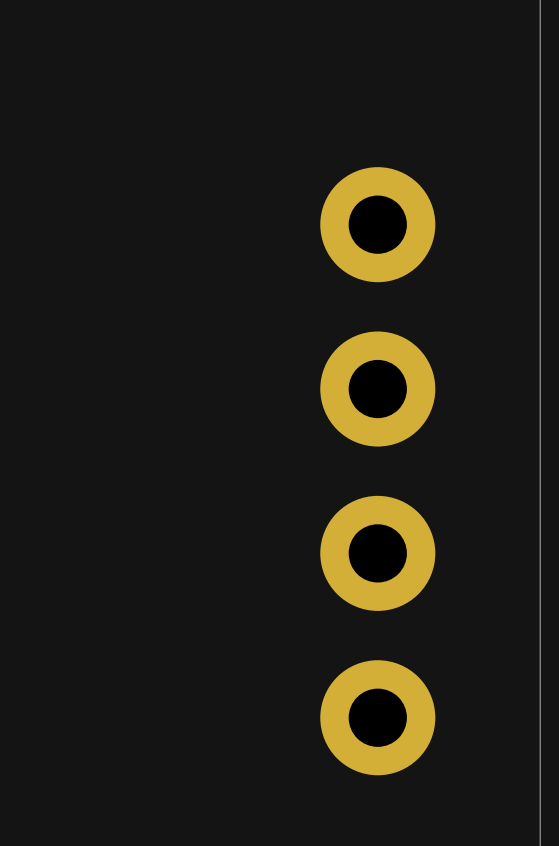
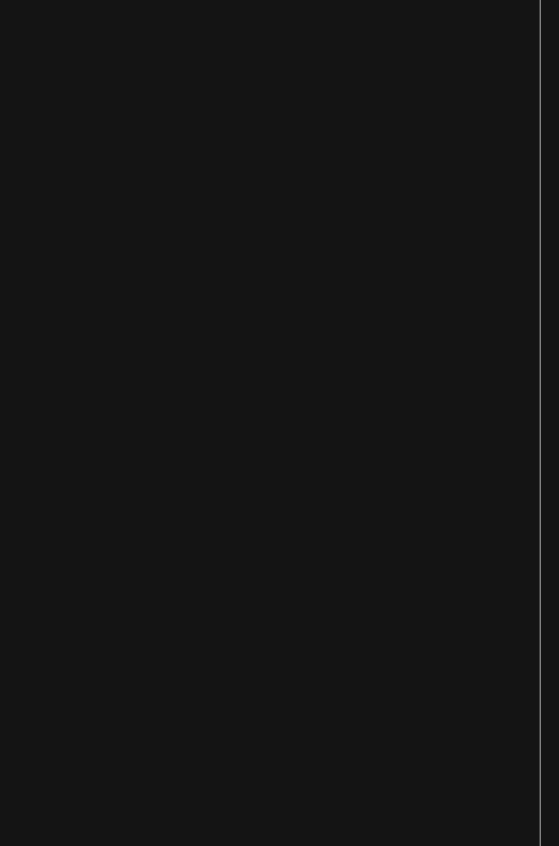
part: (377, 471) -> none

